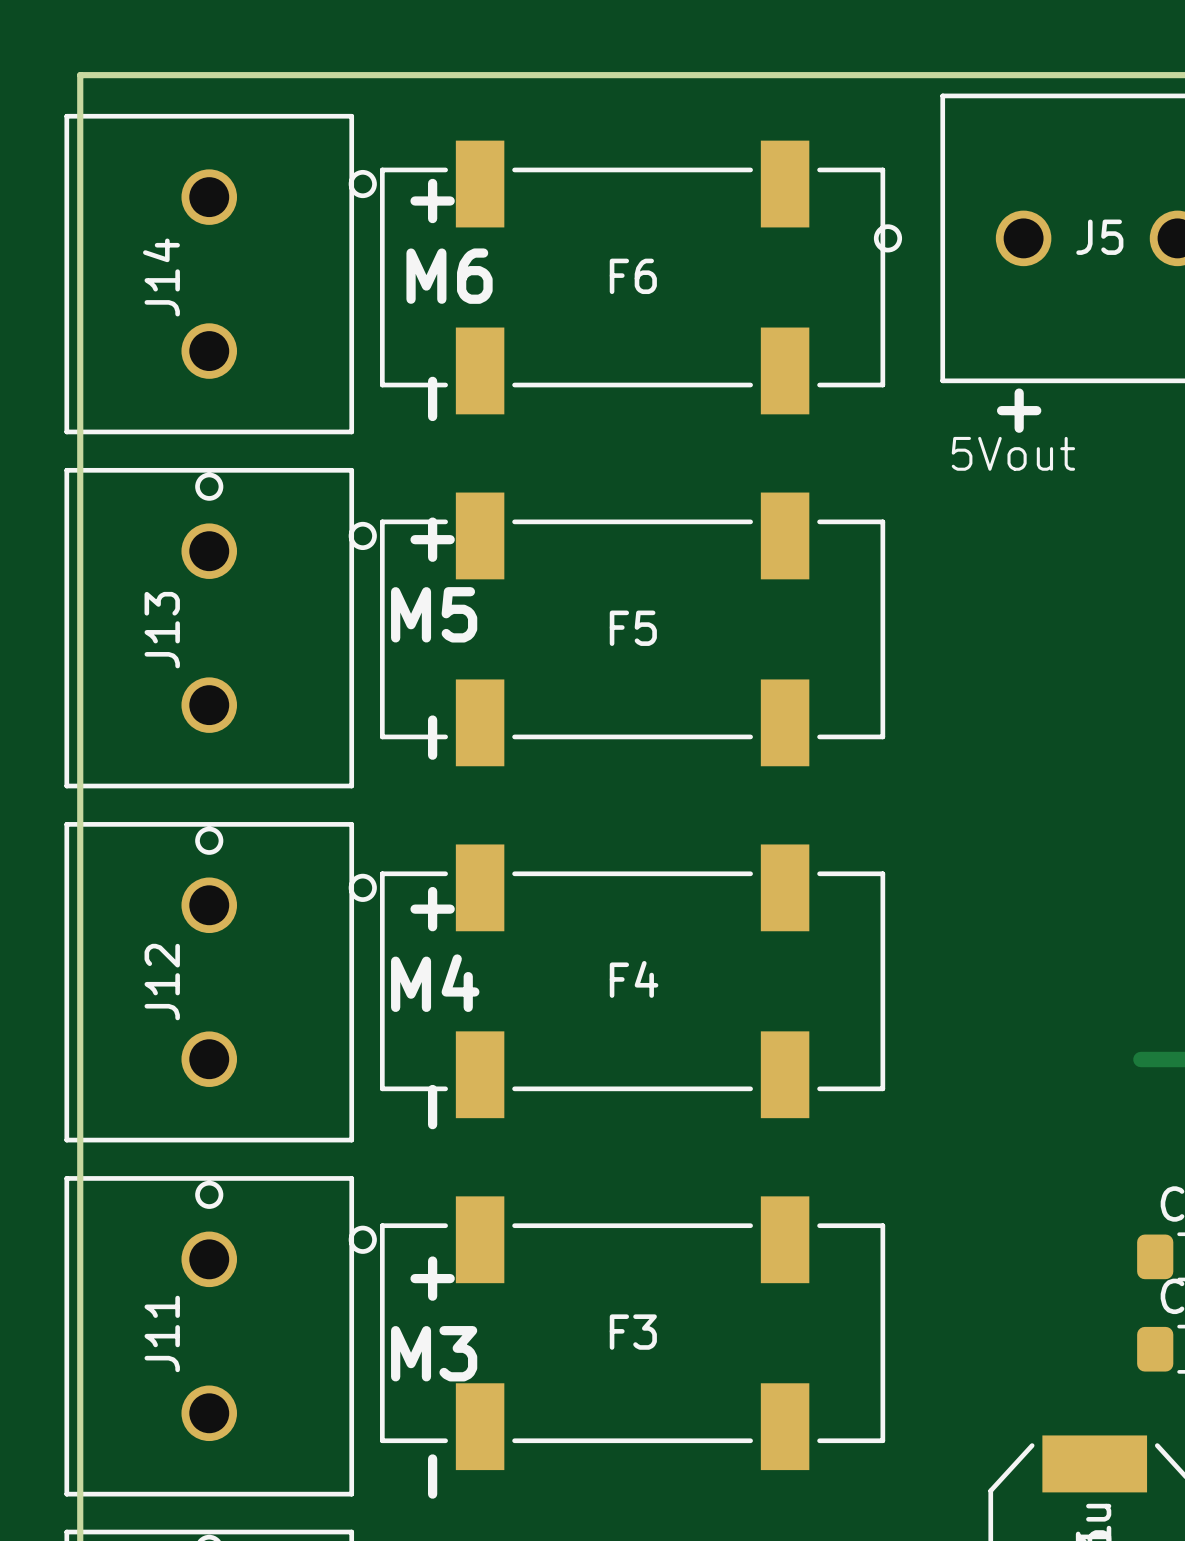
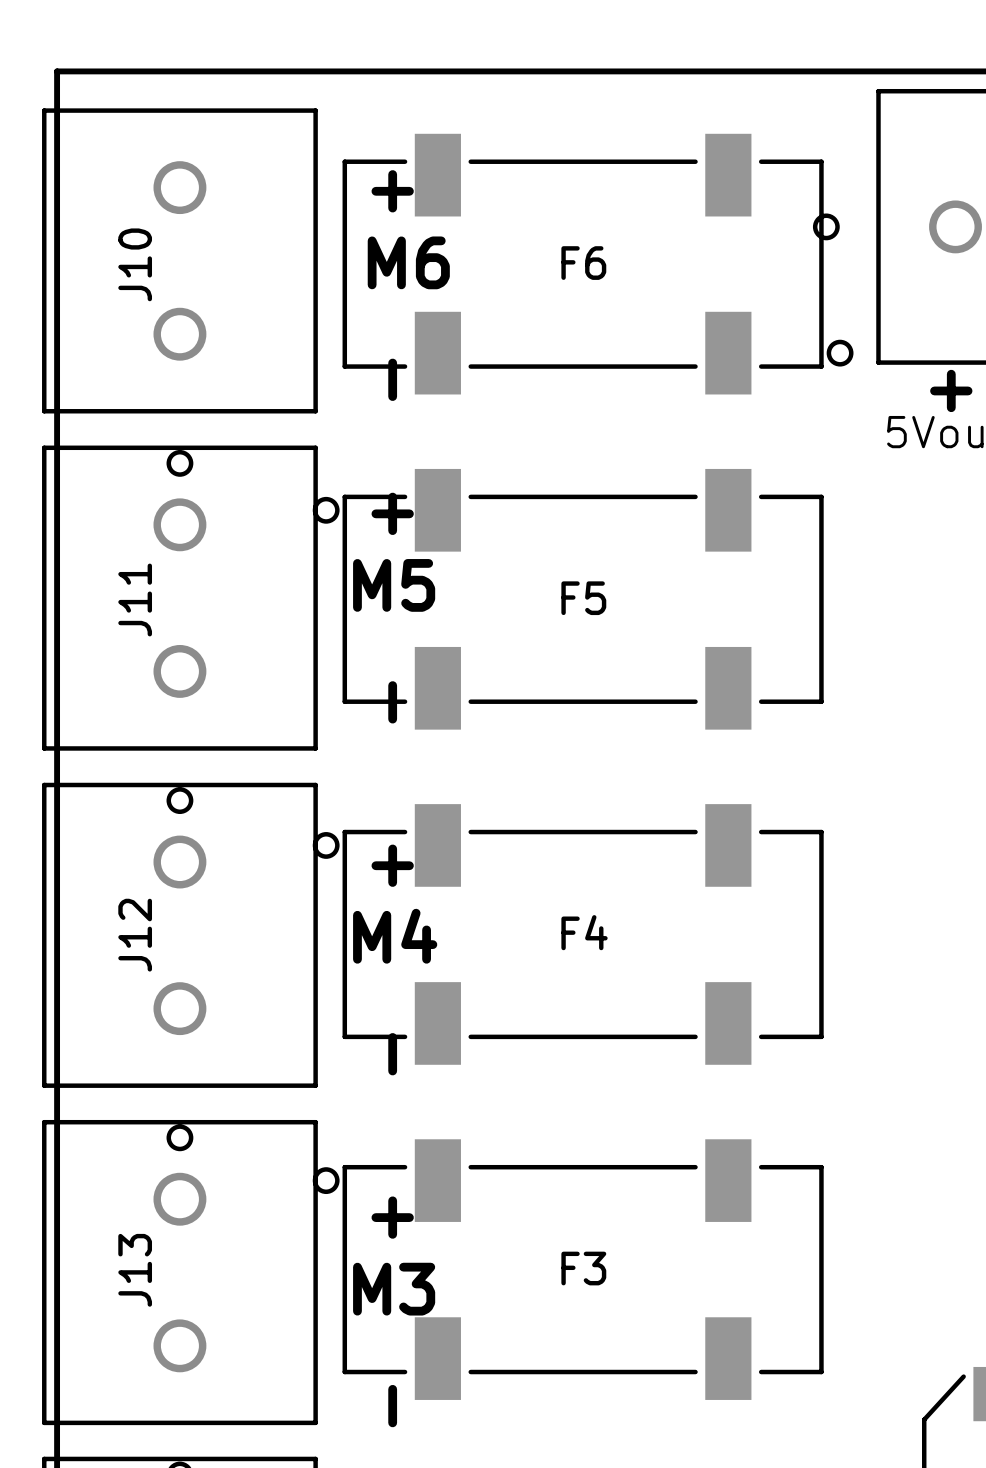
J14 name: J14 (161, 277) -> J10 (135, 264)
F6 rotation: 0° (616, 277) -> 180° (598, 264)
J13 name: J13 (162, 630) -> J11 (135, 599)
J11 name: J11 (162, 1333) -> J13 (135, 1270)

